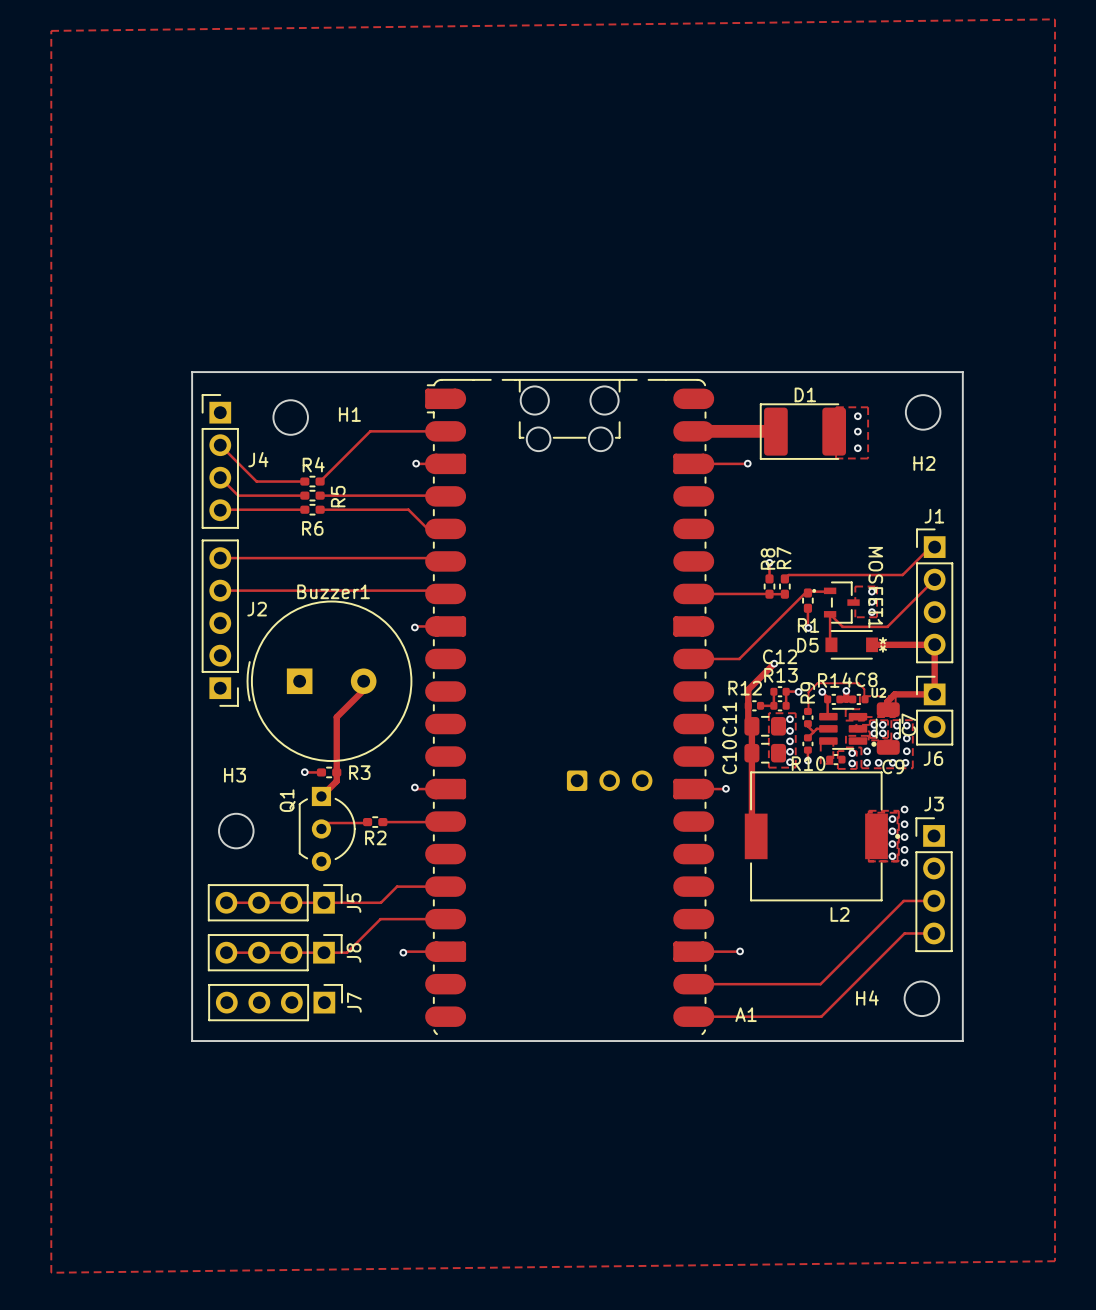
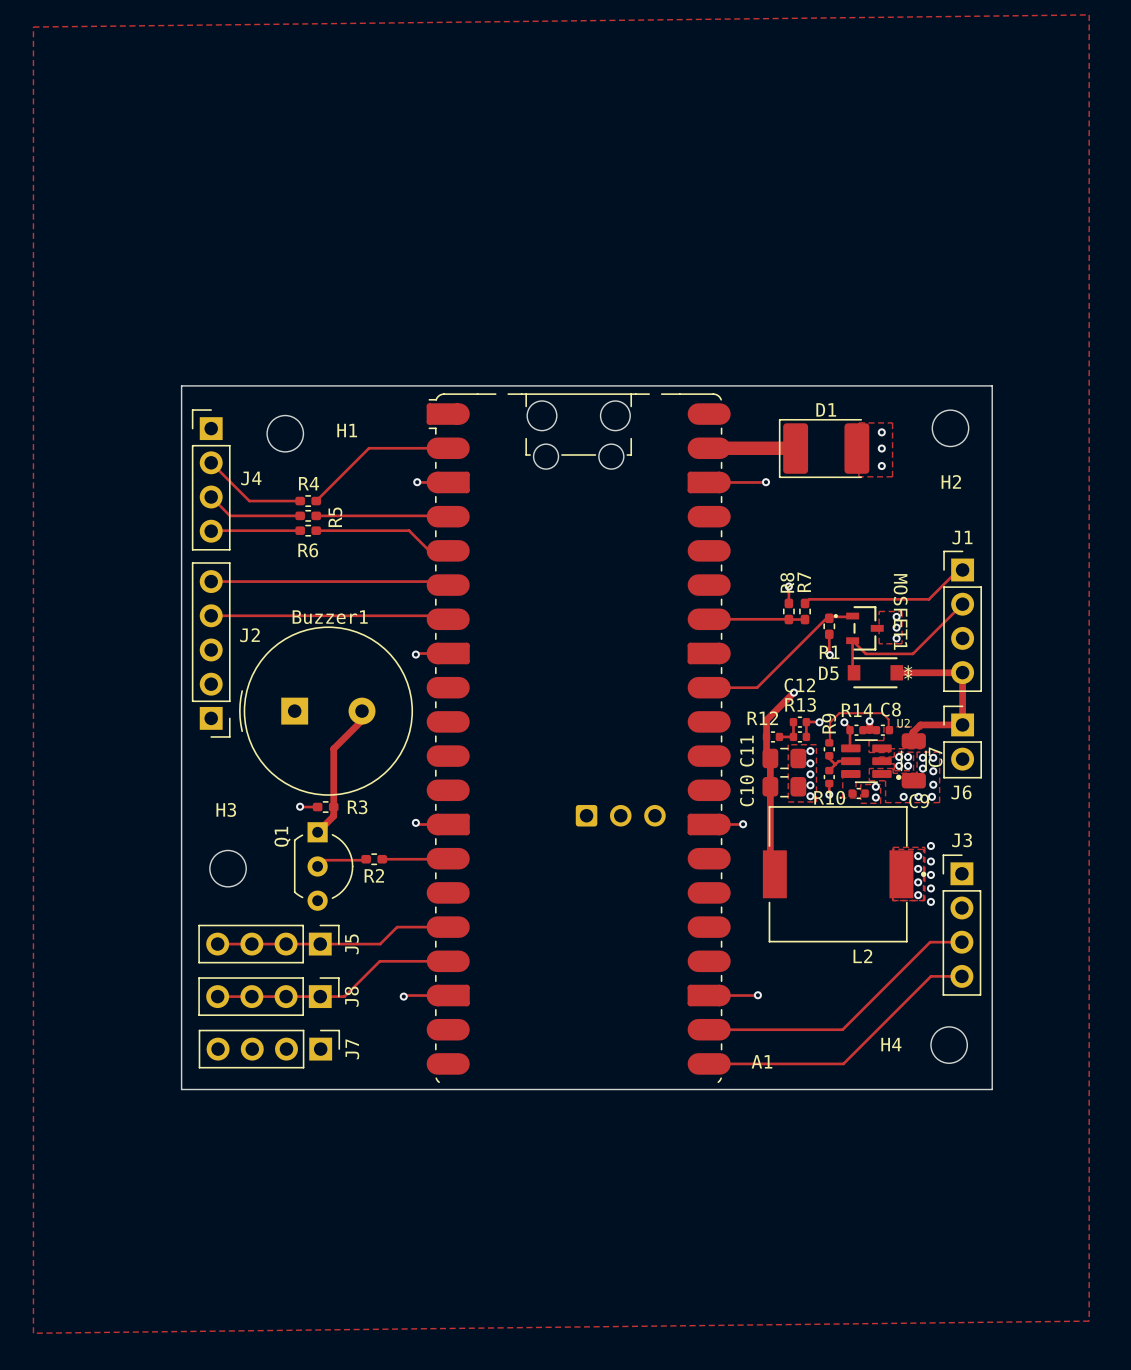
via: (867, 751) -> none
via: (867, 762) -> none

